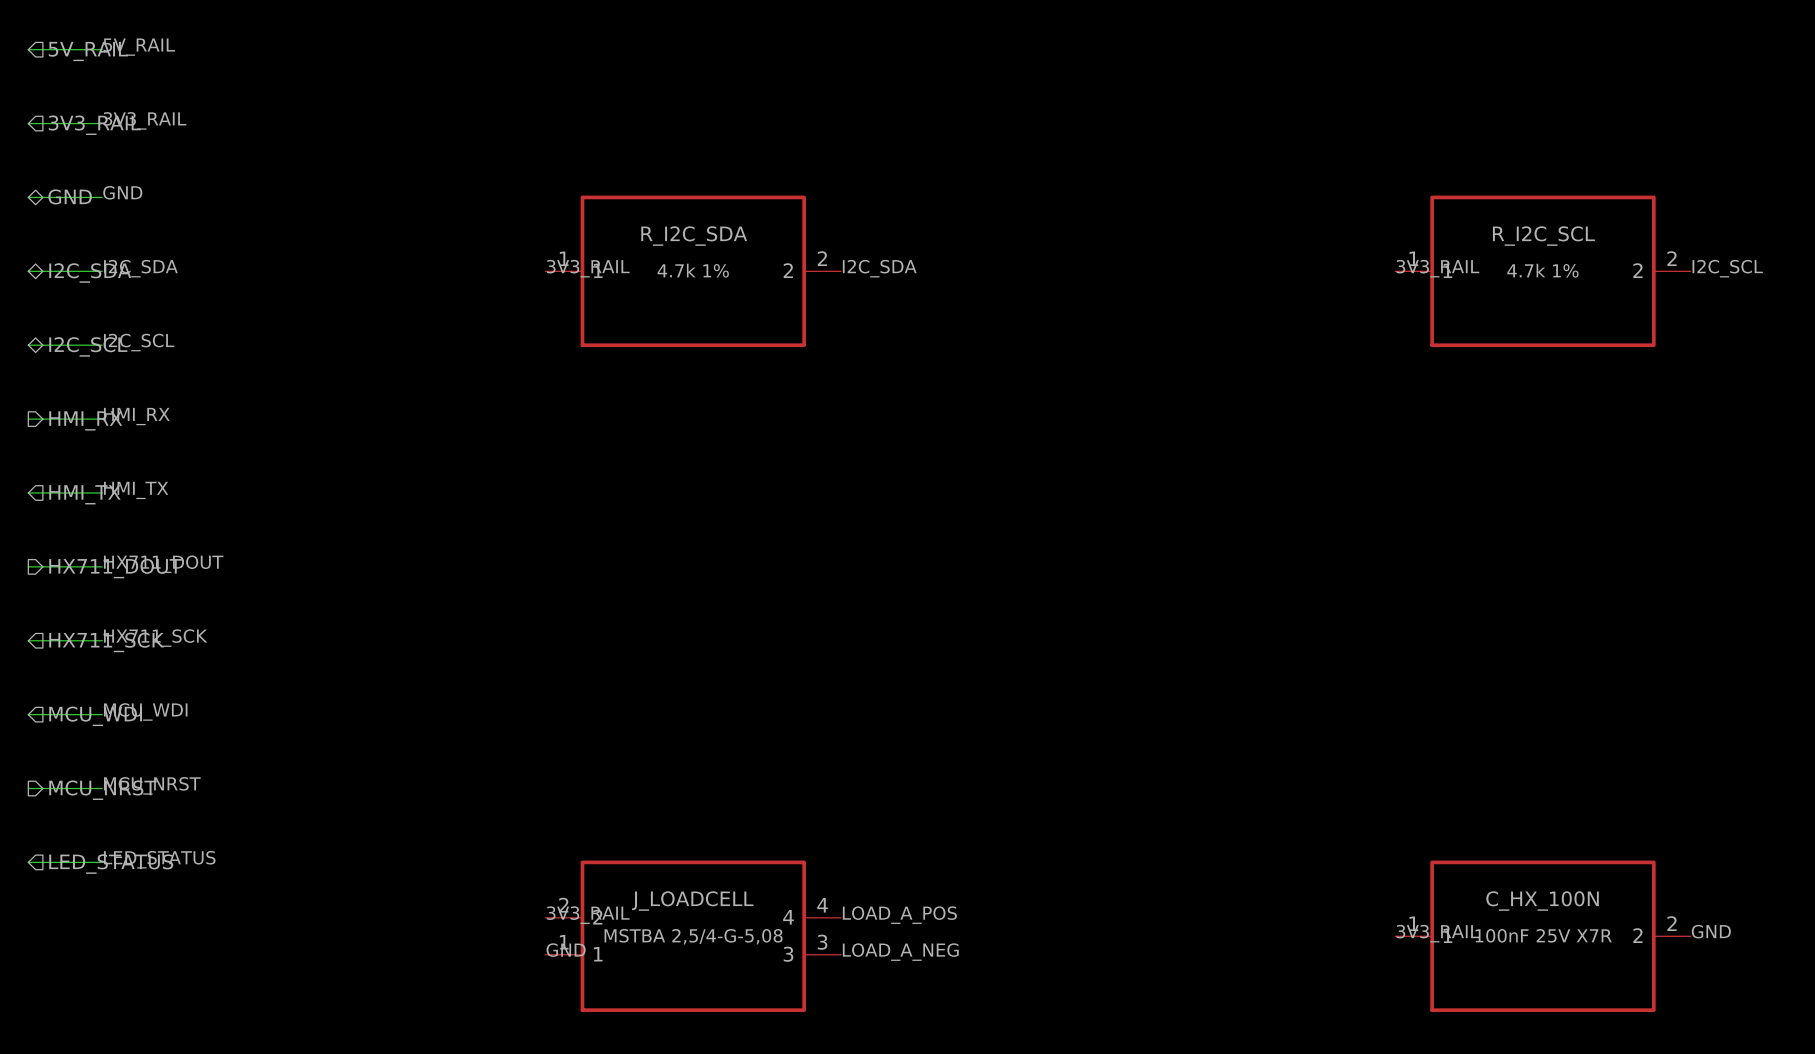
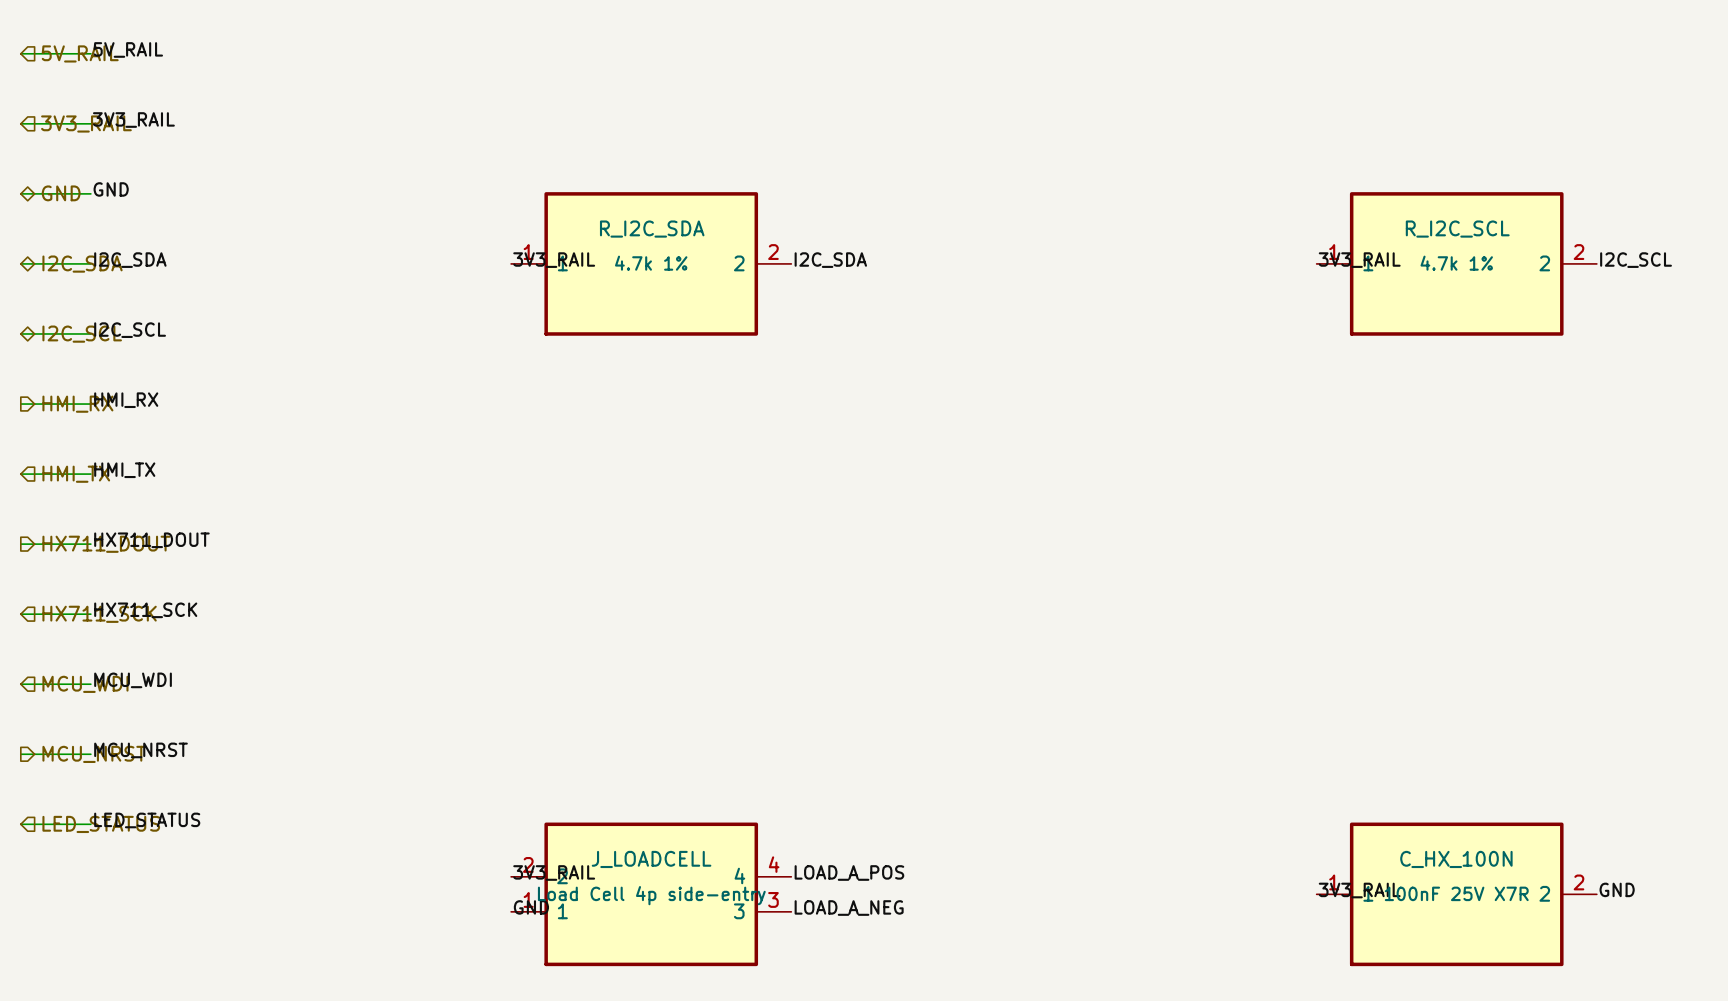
J_LOADCELL value: MSTBA 2,5/4-G-5,08 (693, 936) -> Load Cell 4p side-entry (651, 895)

